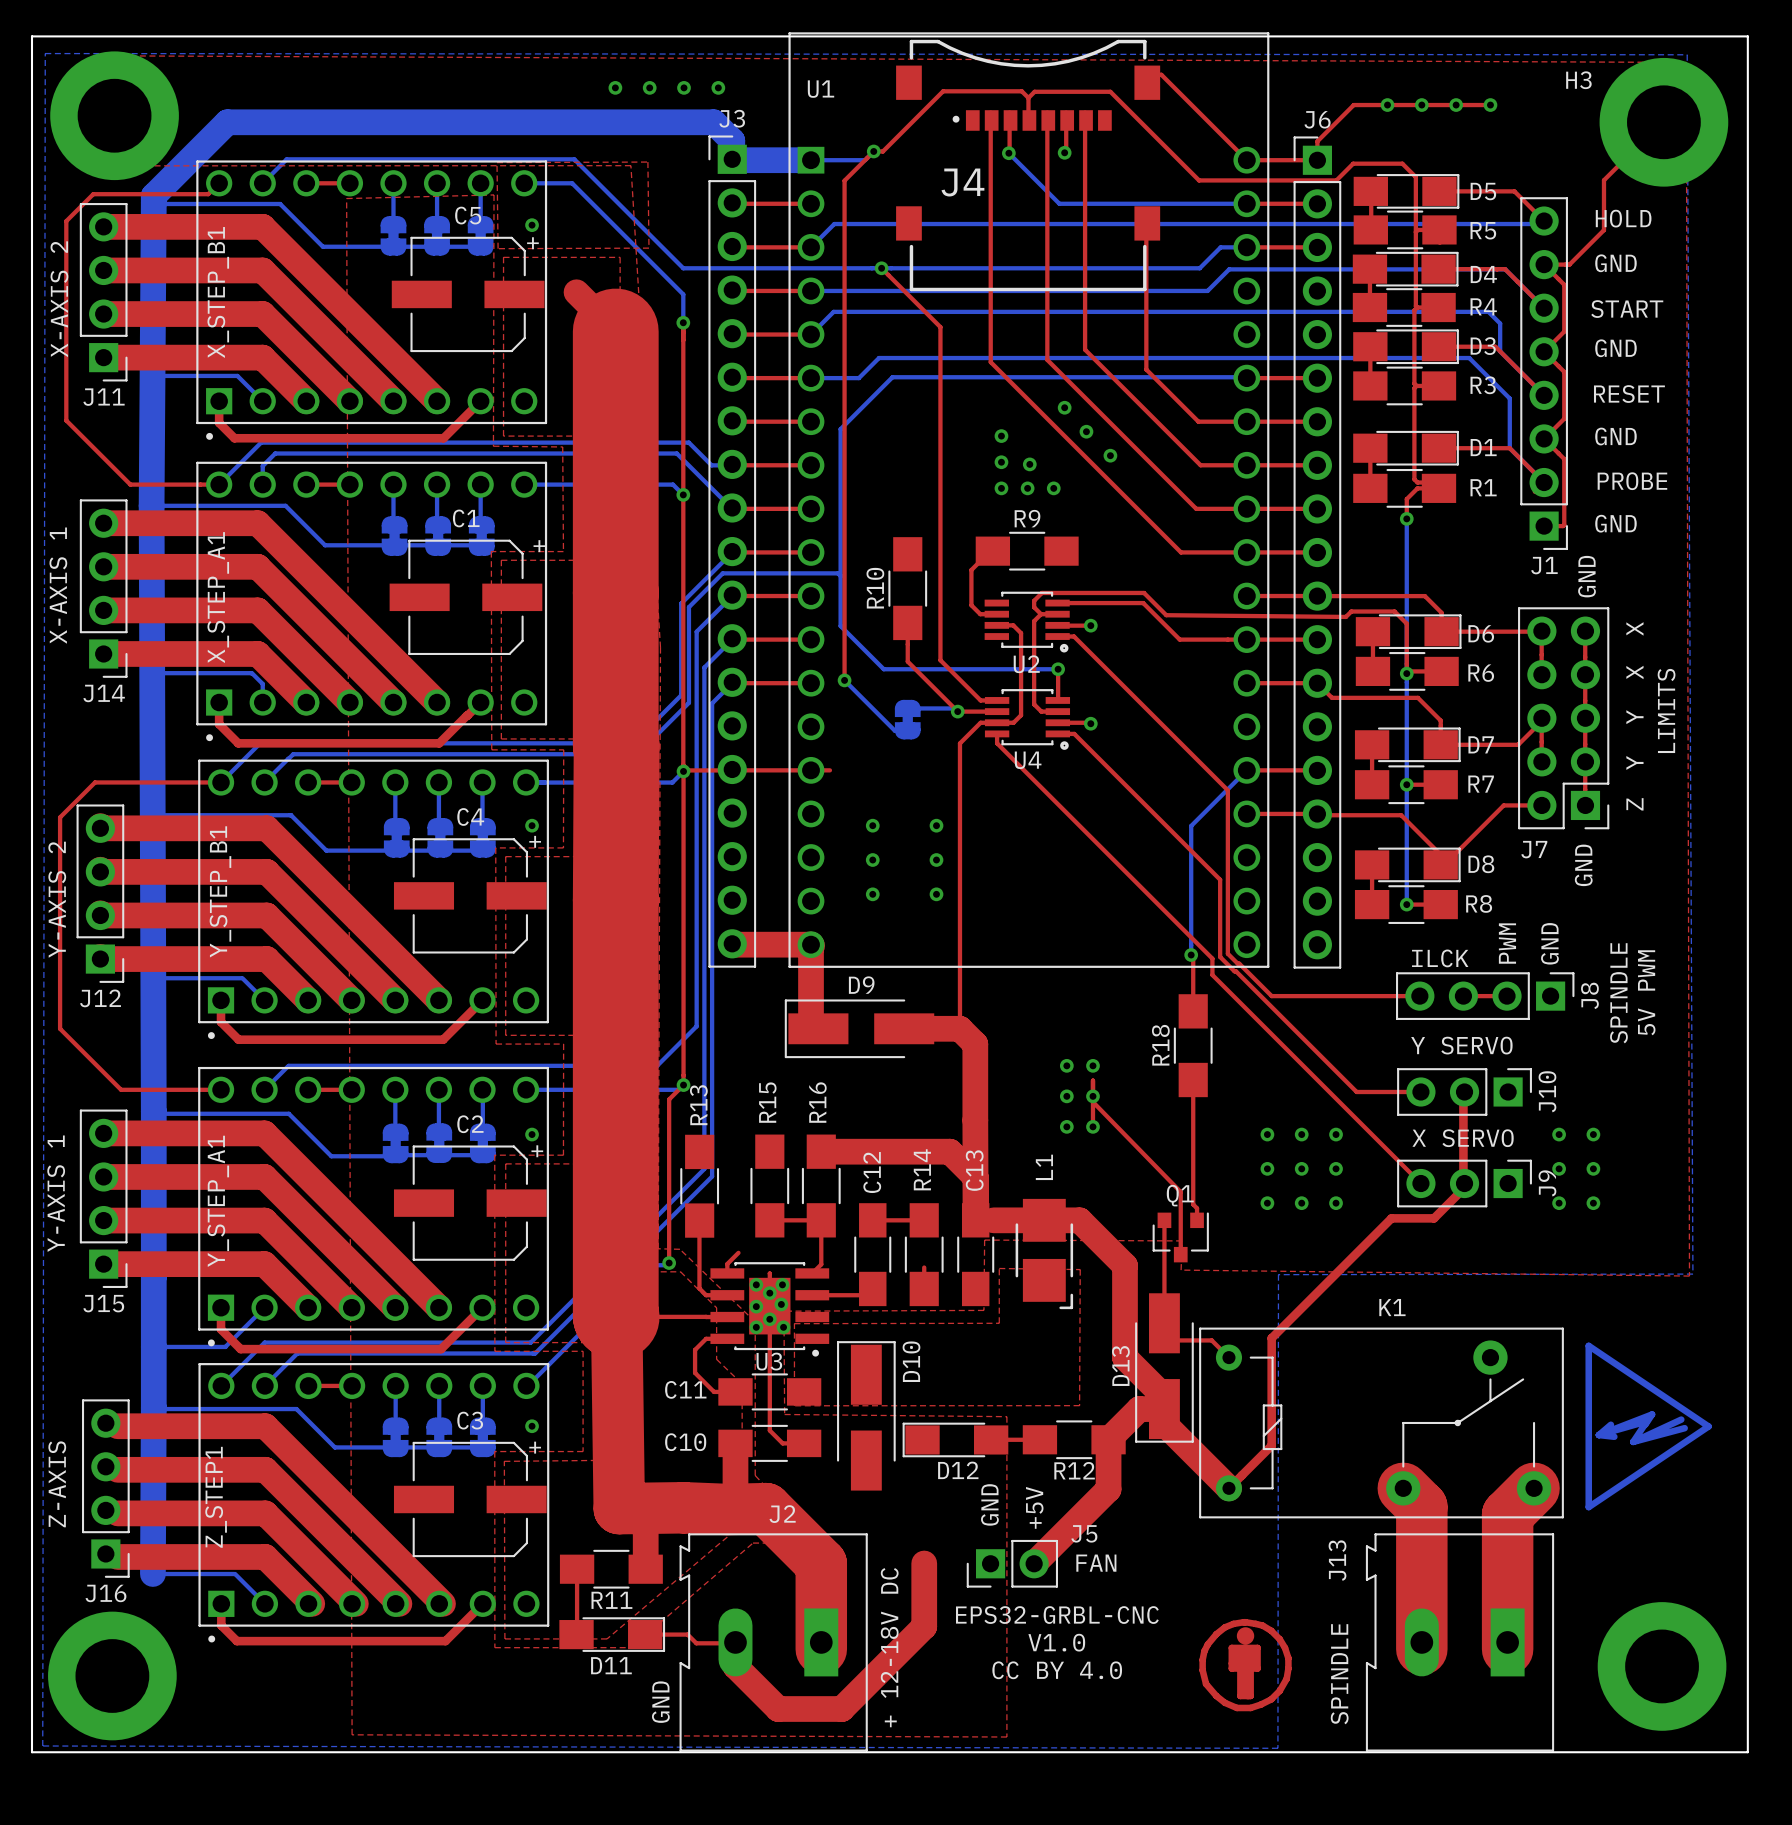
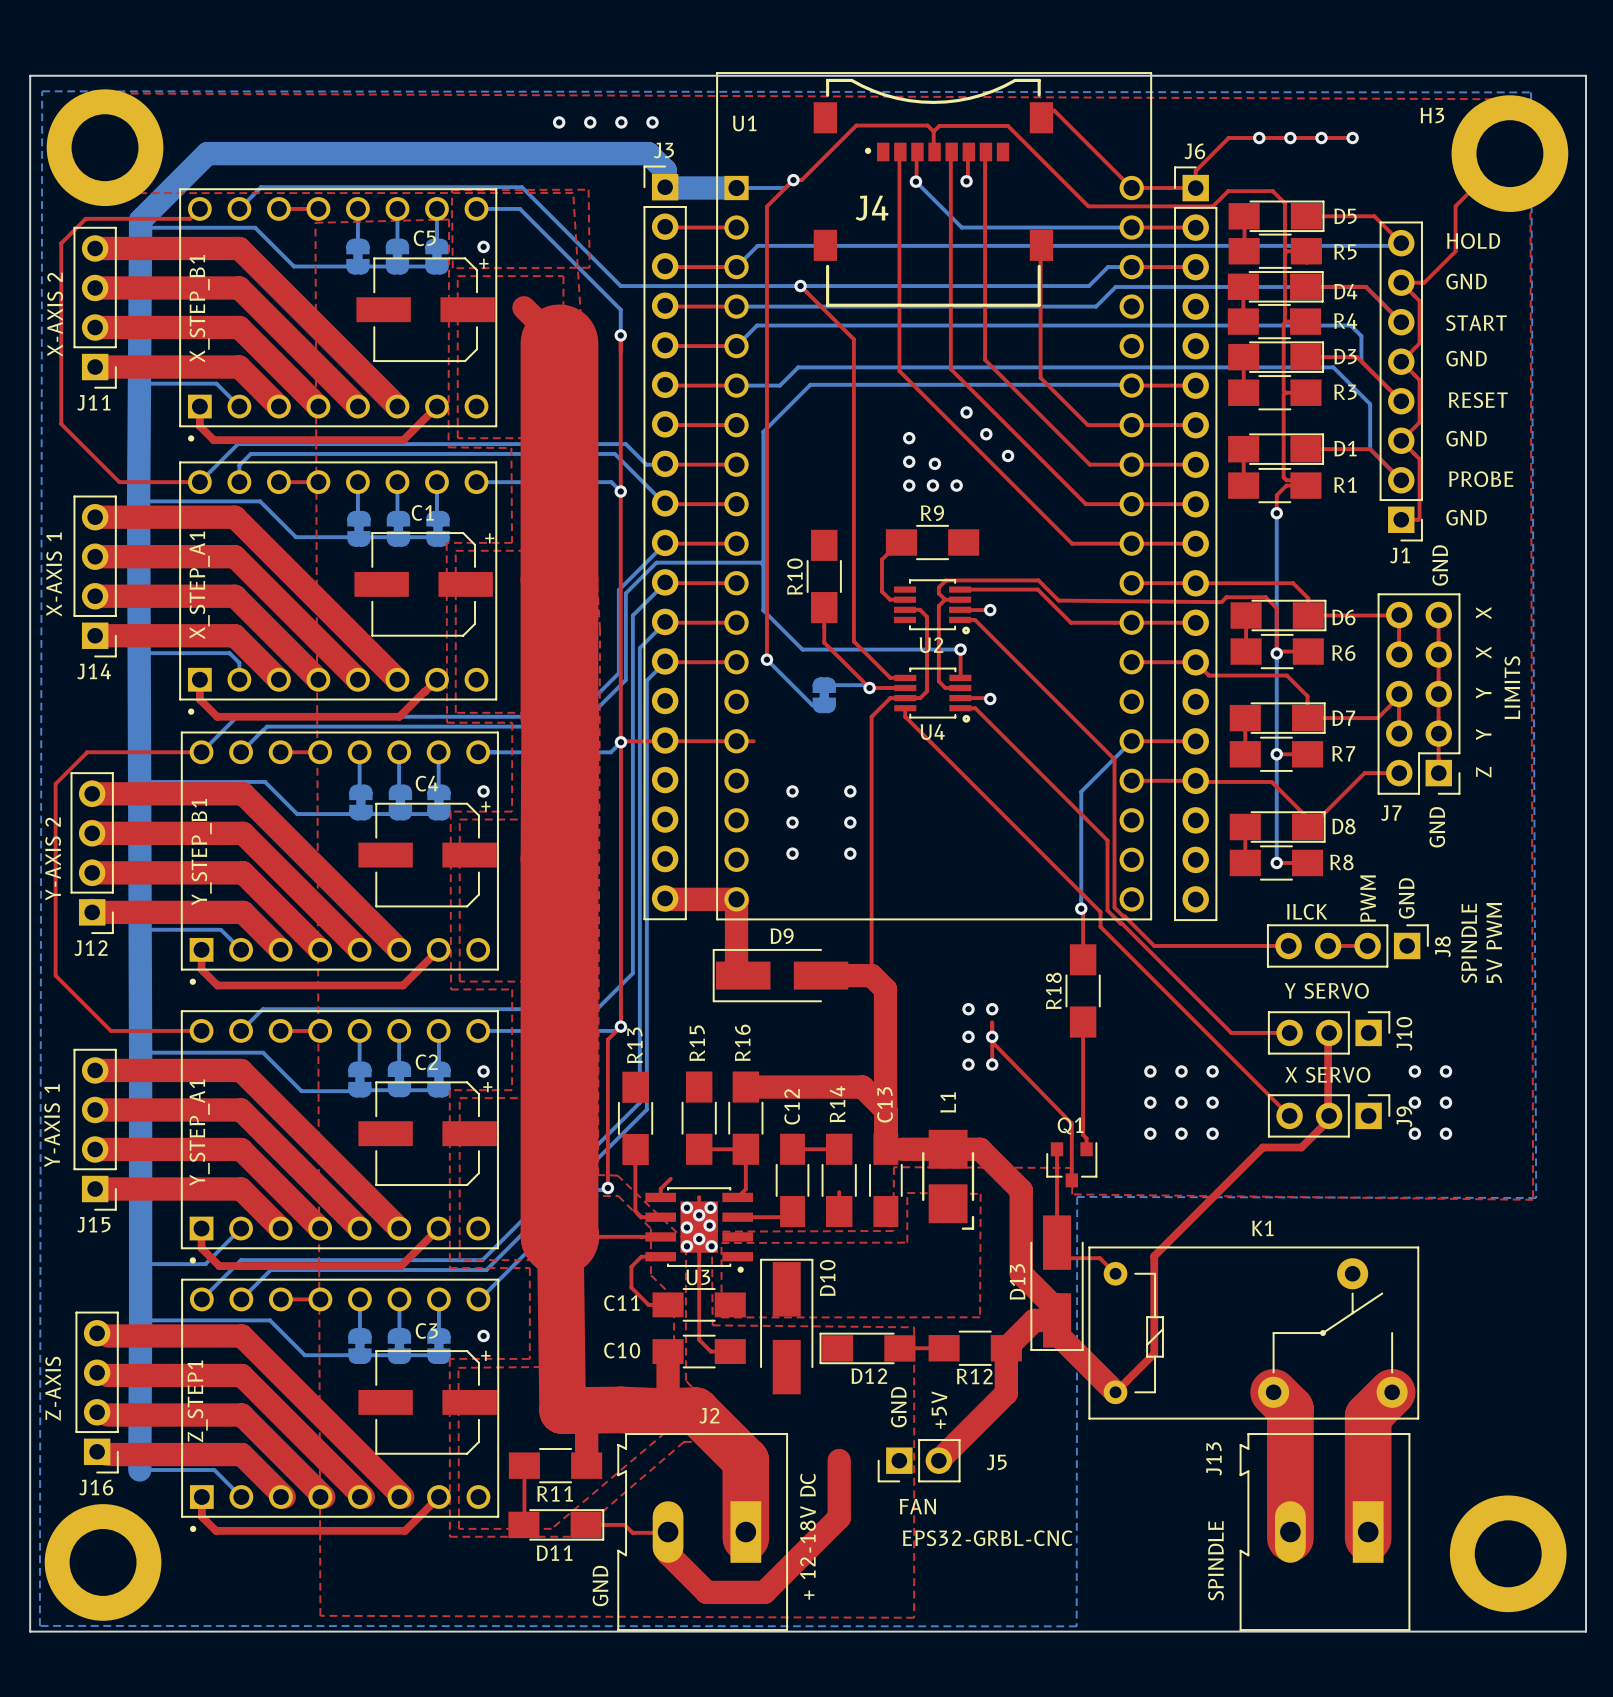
bottom zone outline: (1692, 1274) (1278, 1274) (1277, 1748) (42, 1745) -> (1536, 1198) (1077, 1196) (1076, 1626) (39, 1625)
drawing: [1585, 1342, 1712, 1511] -> none
J5 name position: J5 (1084, 1533) -> J5 (996, 1462)
text position: FAN (1096, 1563) -> FAN (917, 1506)
text position: EPS32-GRBL-CNC (1057, 1615) -> EPS32-GRBL-CNC (987, 1538)
drawing: [1199, 1618, 1292, 1712] -> none
text: V1.0 (1056, 1642) -> none
text: CC BY 4.0 (1057, 1670) -> none

